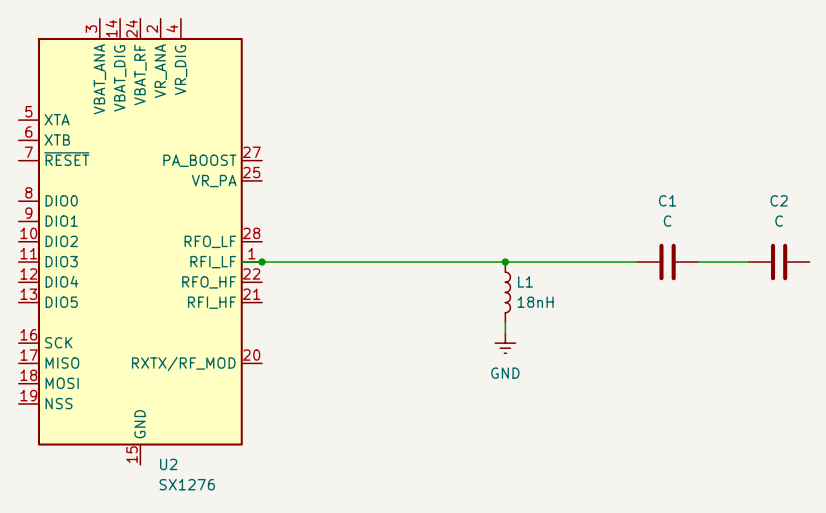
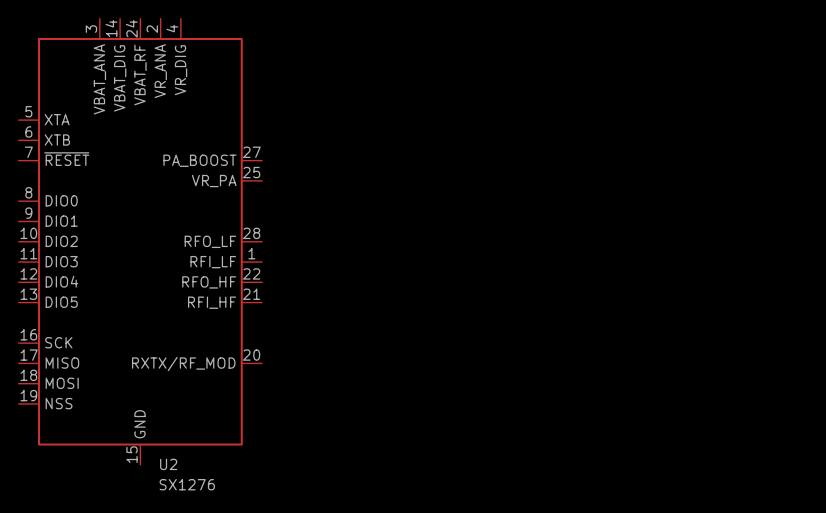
wire: (241, 262) (637, 262) -> none
junction: (262, 262) -> none
junction: (505, 262) -> none
C1: C (667, 262) -> none
wire: (697, 262) (748, 262) -> none
C2: C (779, 262) -> none
L1: 18nH (507, 292) -> none
wire: (505, 322) (505, 333) -> none
power symbol: GND (505, 343) -> none

